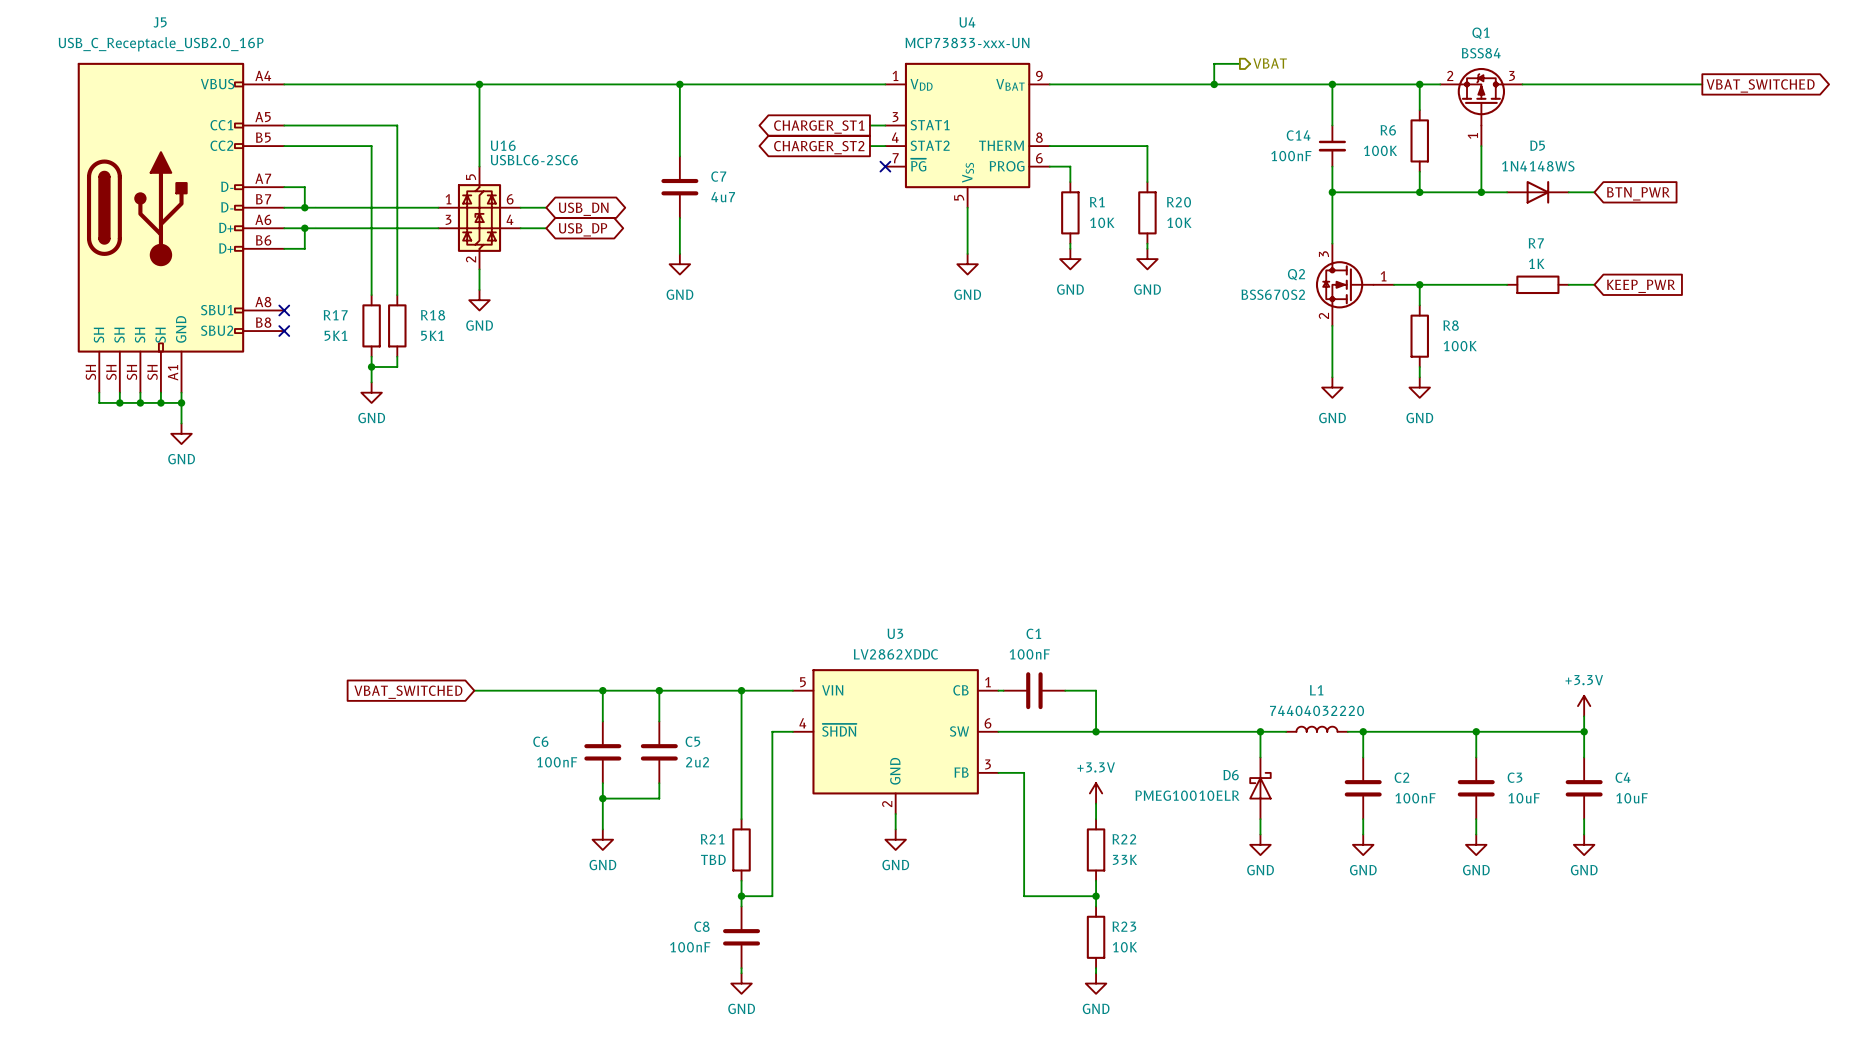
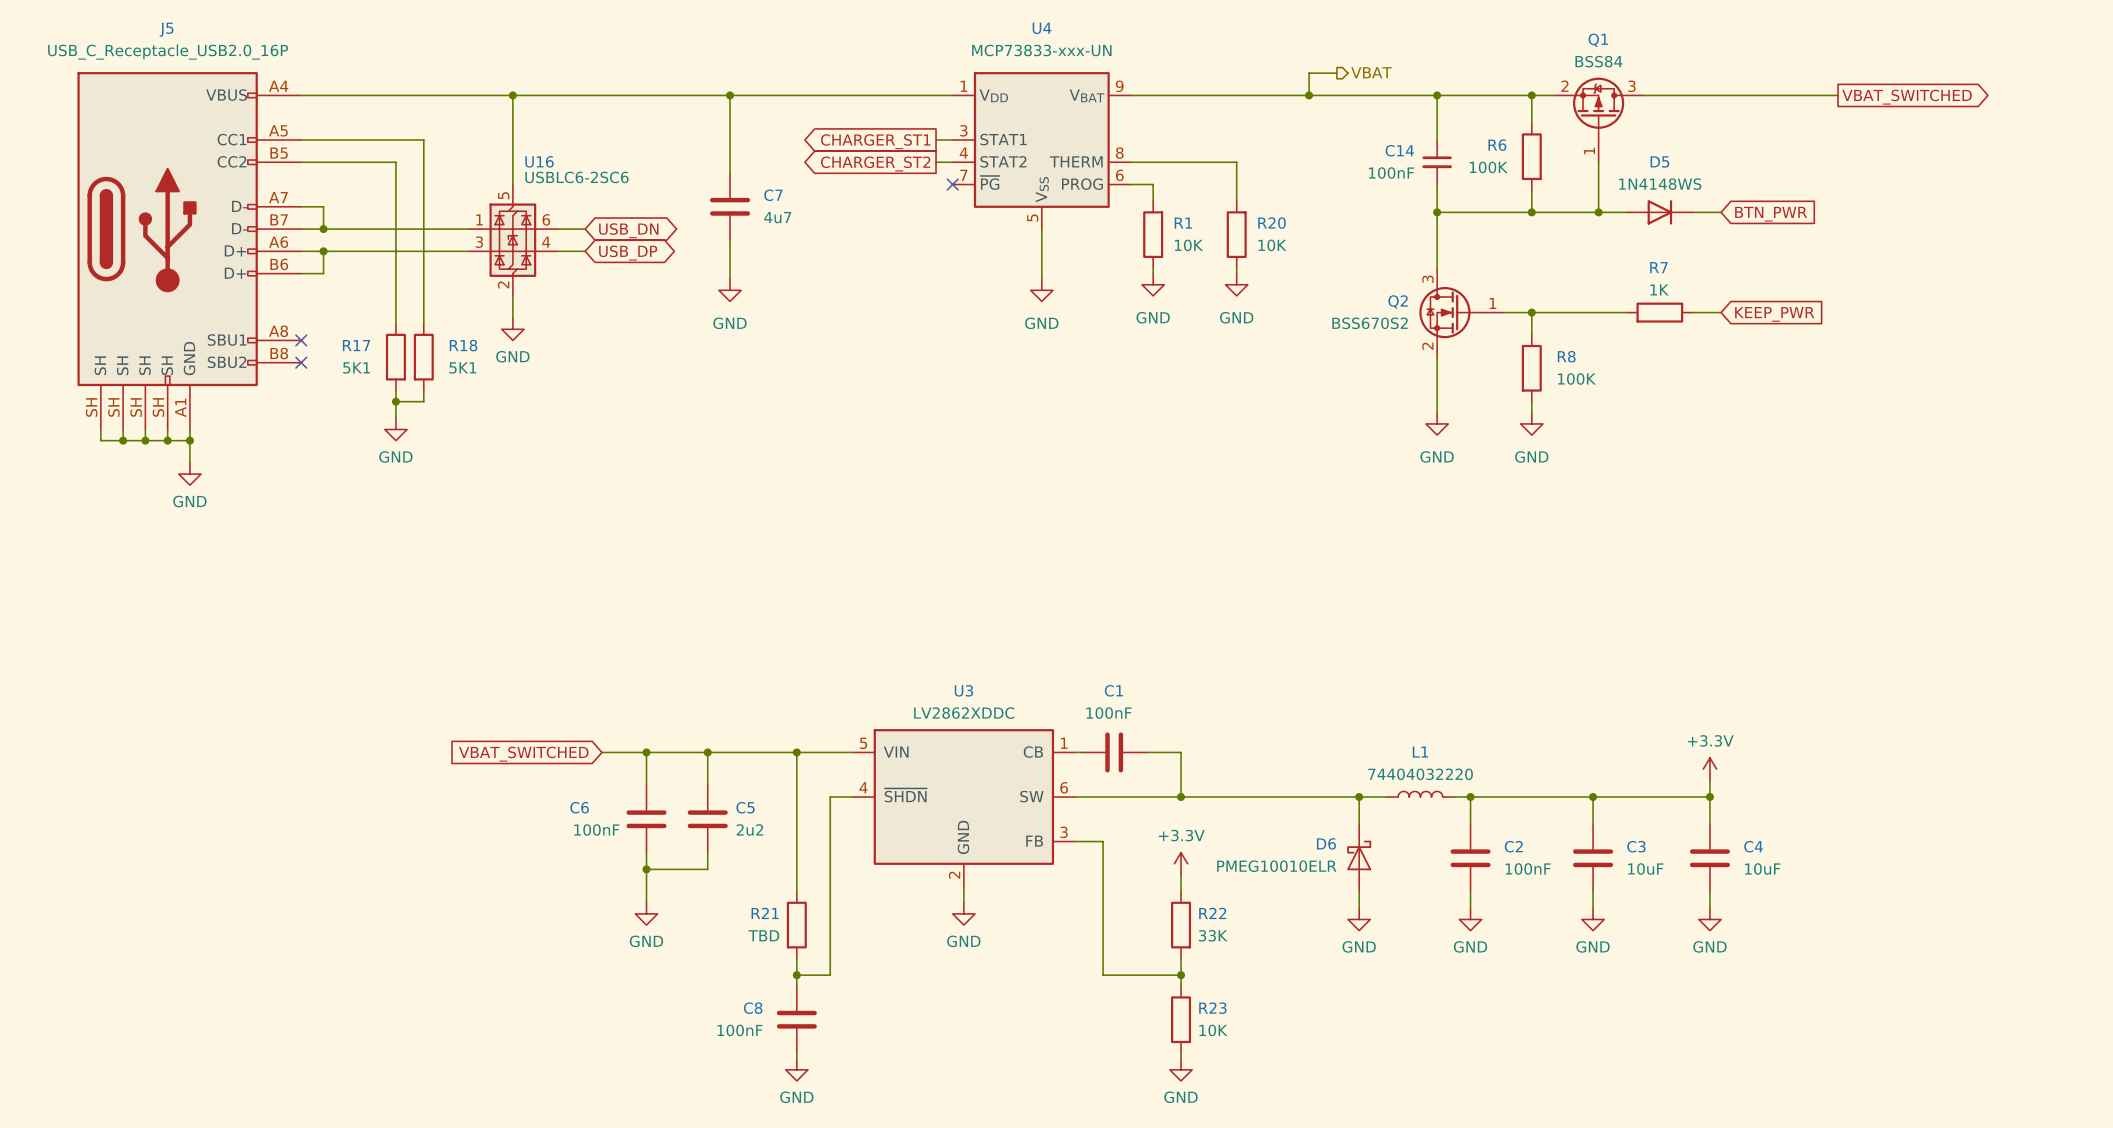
wire: (474, 690) (561, 690) -> none
global label position: VBAT_SWITCHED (408, 692) -> VBAT_SWITCHED (523, 754)

